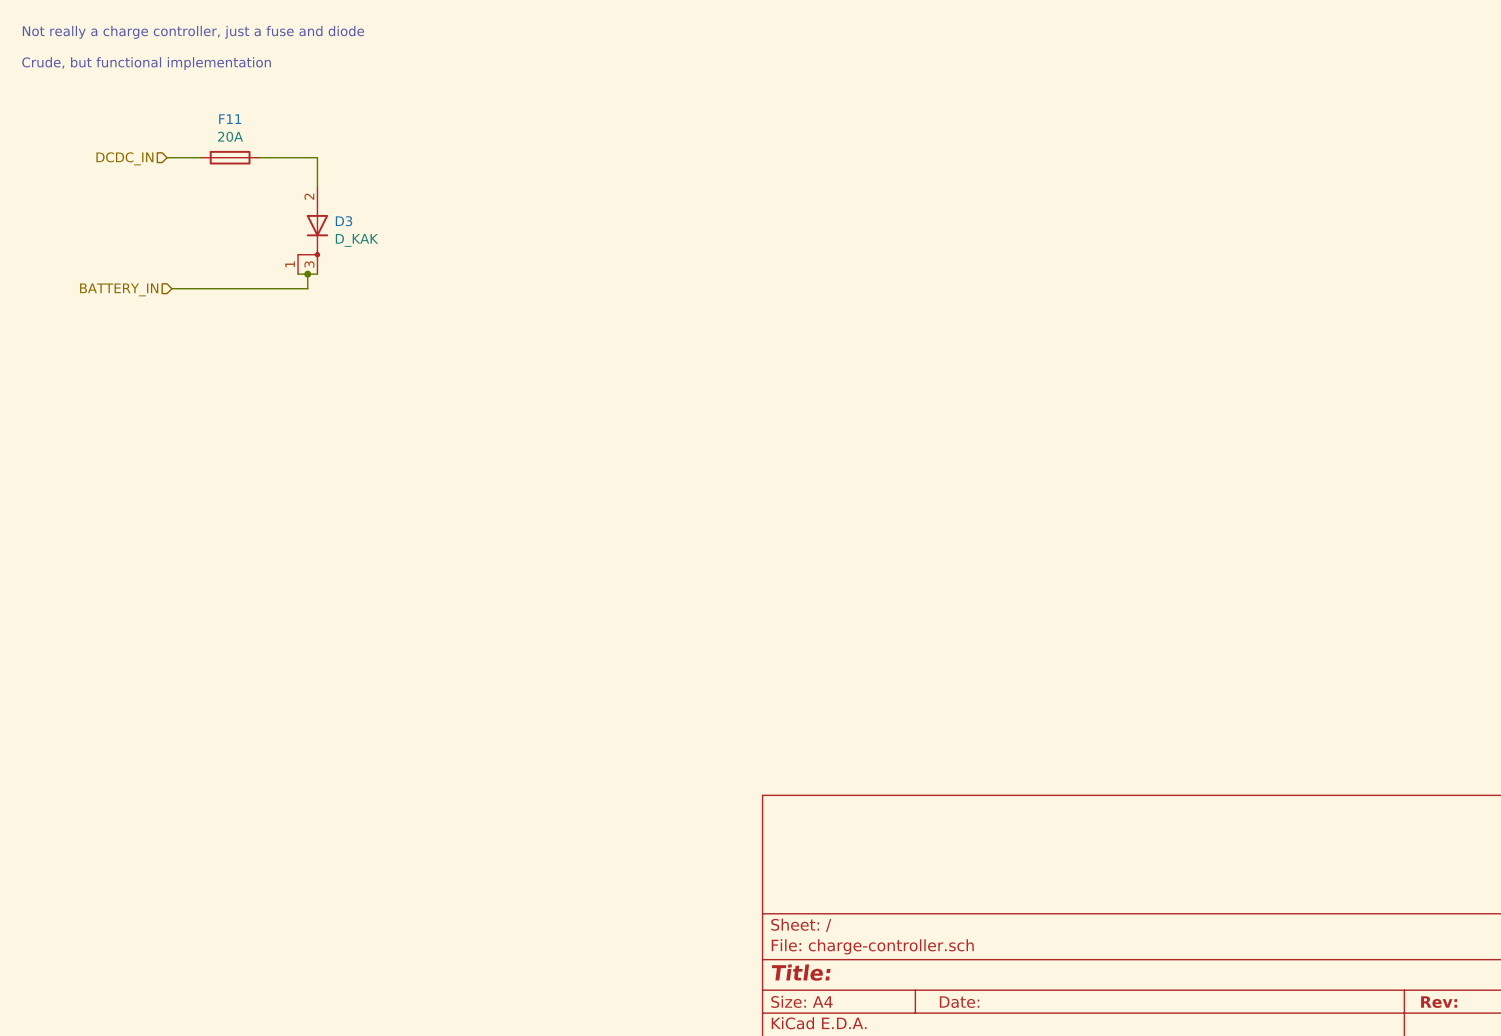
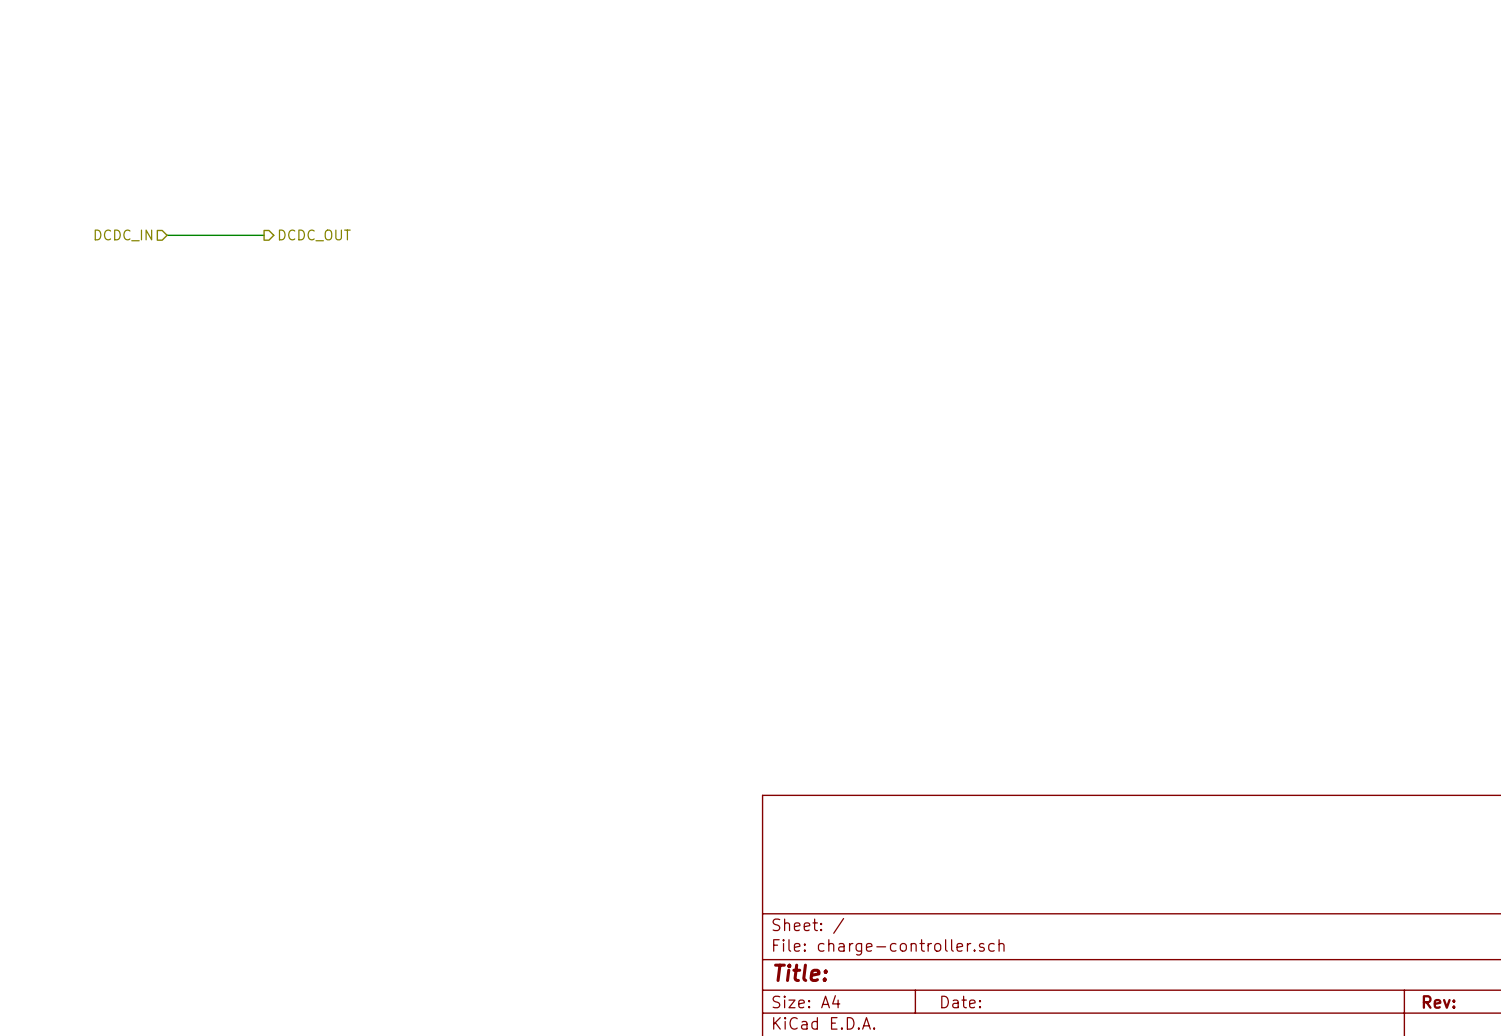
text: Not really a charge controller, just a fuse and diode (193, 32) -> none
text: Crude, but functional implementation (146, 63) -> none
wire: (167, 157) (201, 157) -> none
F11: 20A (230, 157) -> none
wire: (259, 157) (317, 157) (317, 186) -> none
hierarchical label position: DCDC_IN (124, 158) -> DCDC_IN (123, 235)
D3: D_KAK (313, 230) -> none
wire: none -> (167, 235) (264, 235)
hierarchical label: none -> DCDC_OUT (314, 235)
wire: (298, 274) (317, 274) -> none
wire: (307, 274) (307, 288) (171, 288) -> none
junction: (307, 274) -> none
hierarchical label: BATTERY_IN (119, 289) -> none

